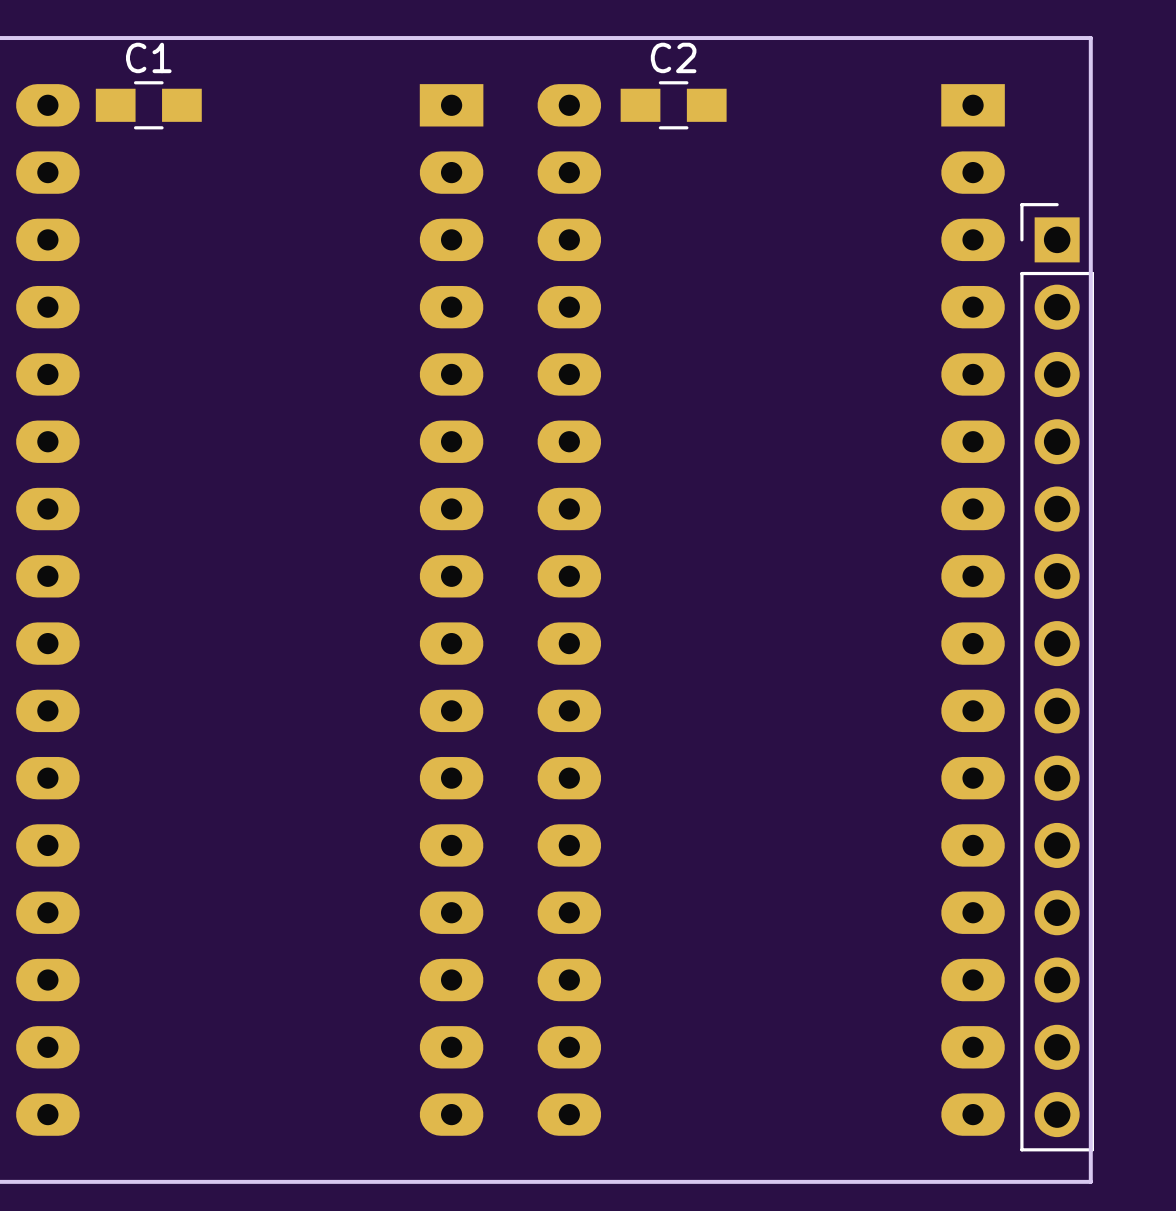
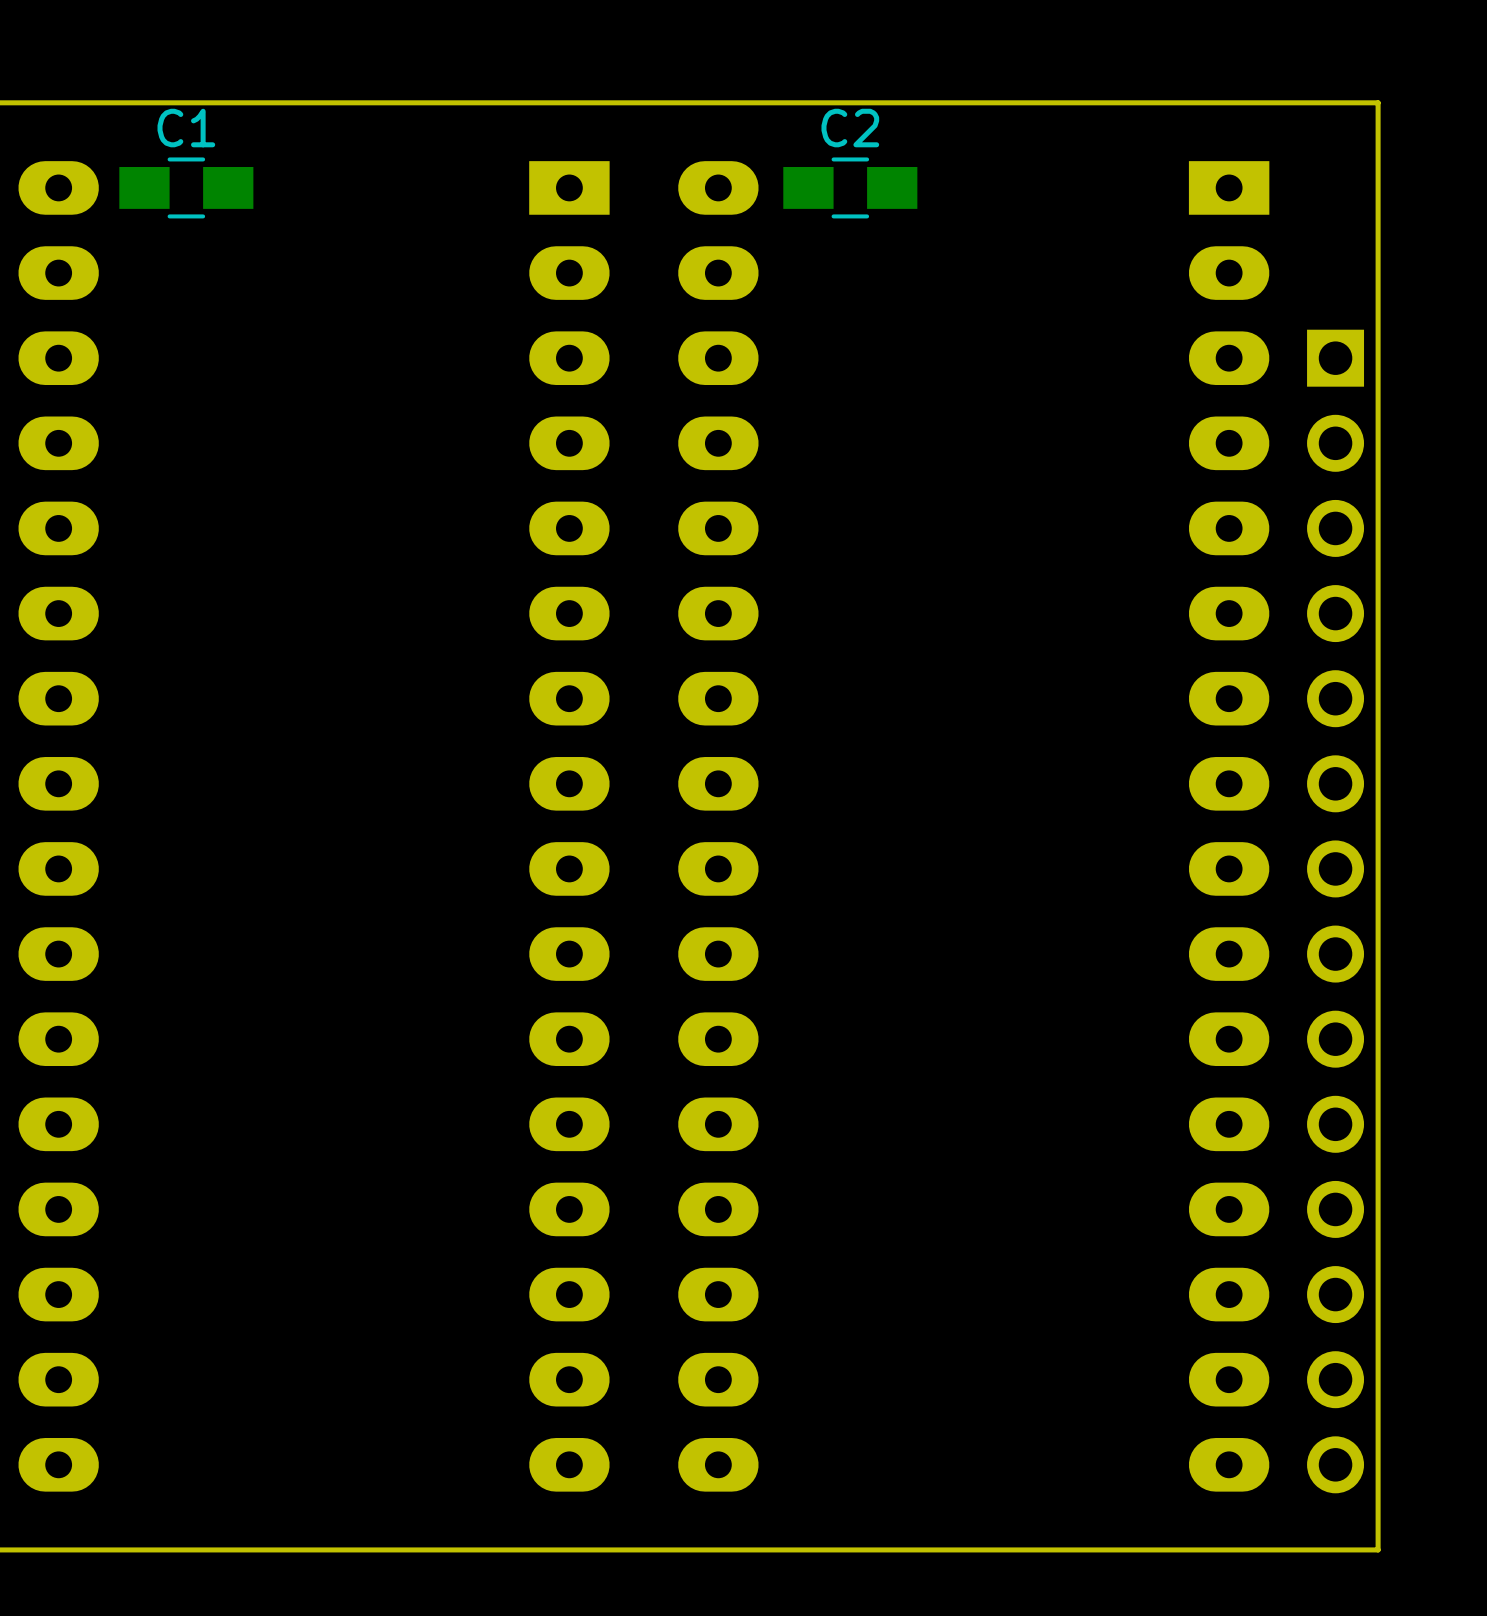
part side: bottom (1057, 677) -> top (1335, 911)

